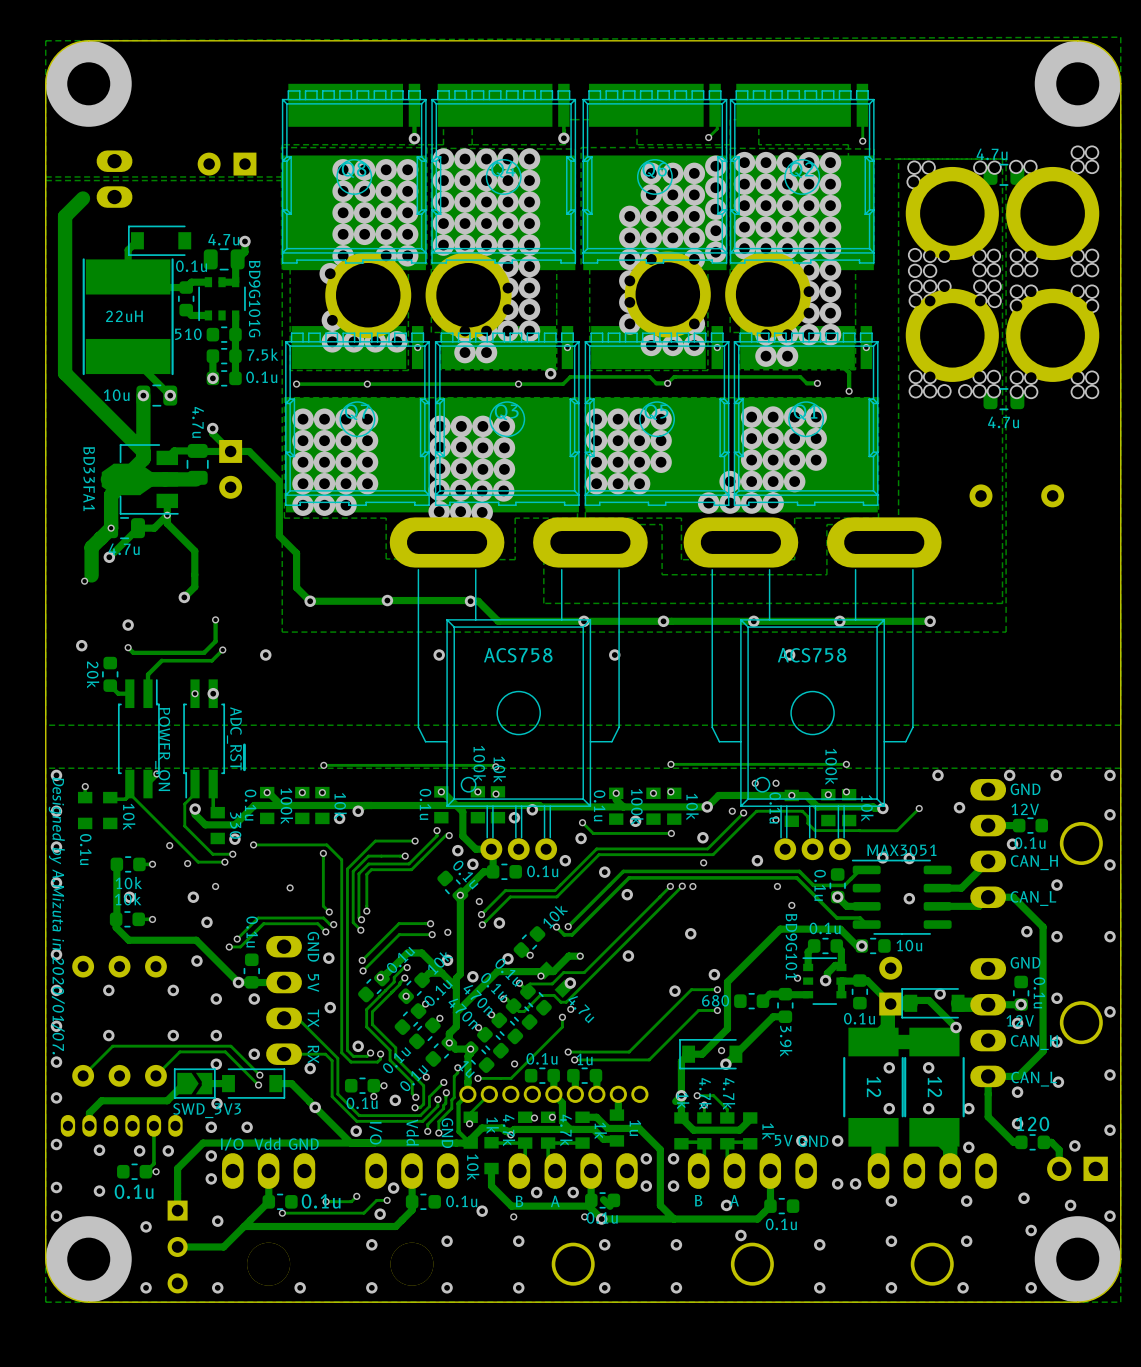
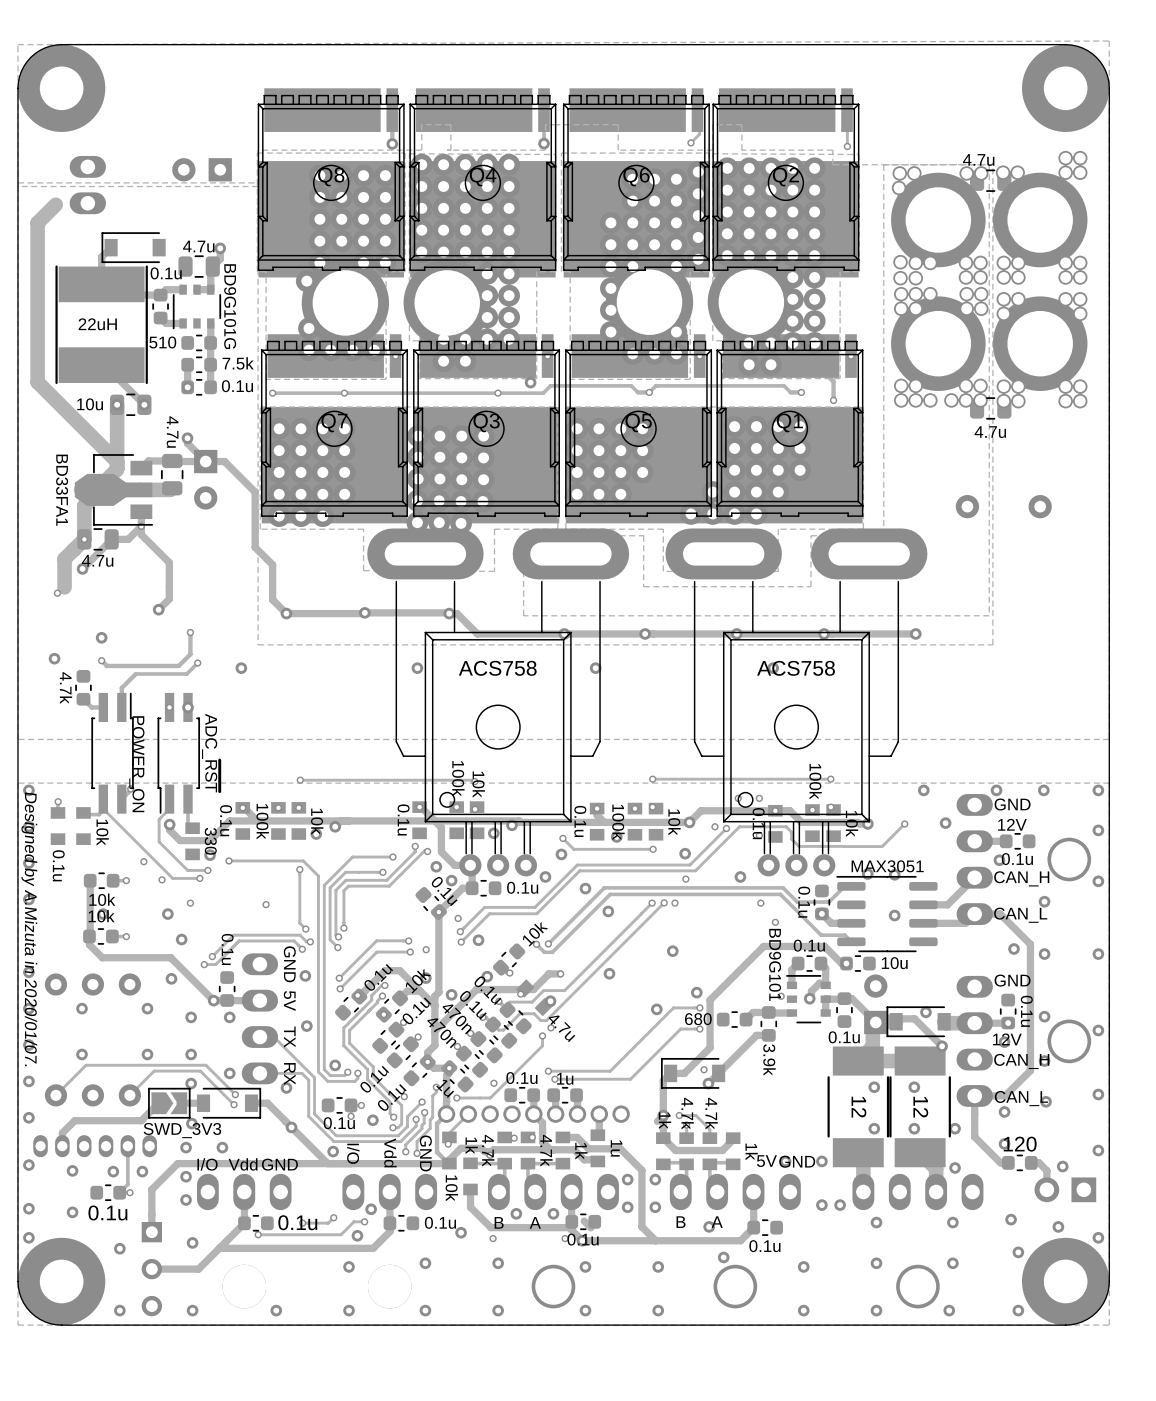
part value: 20k (93, 674) -> 4.7k (66, 688)

